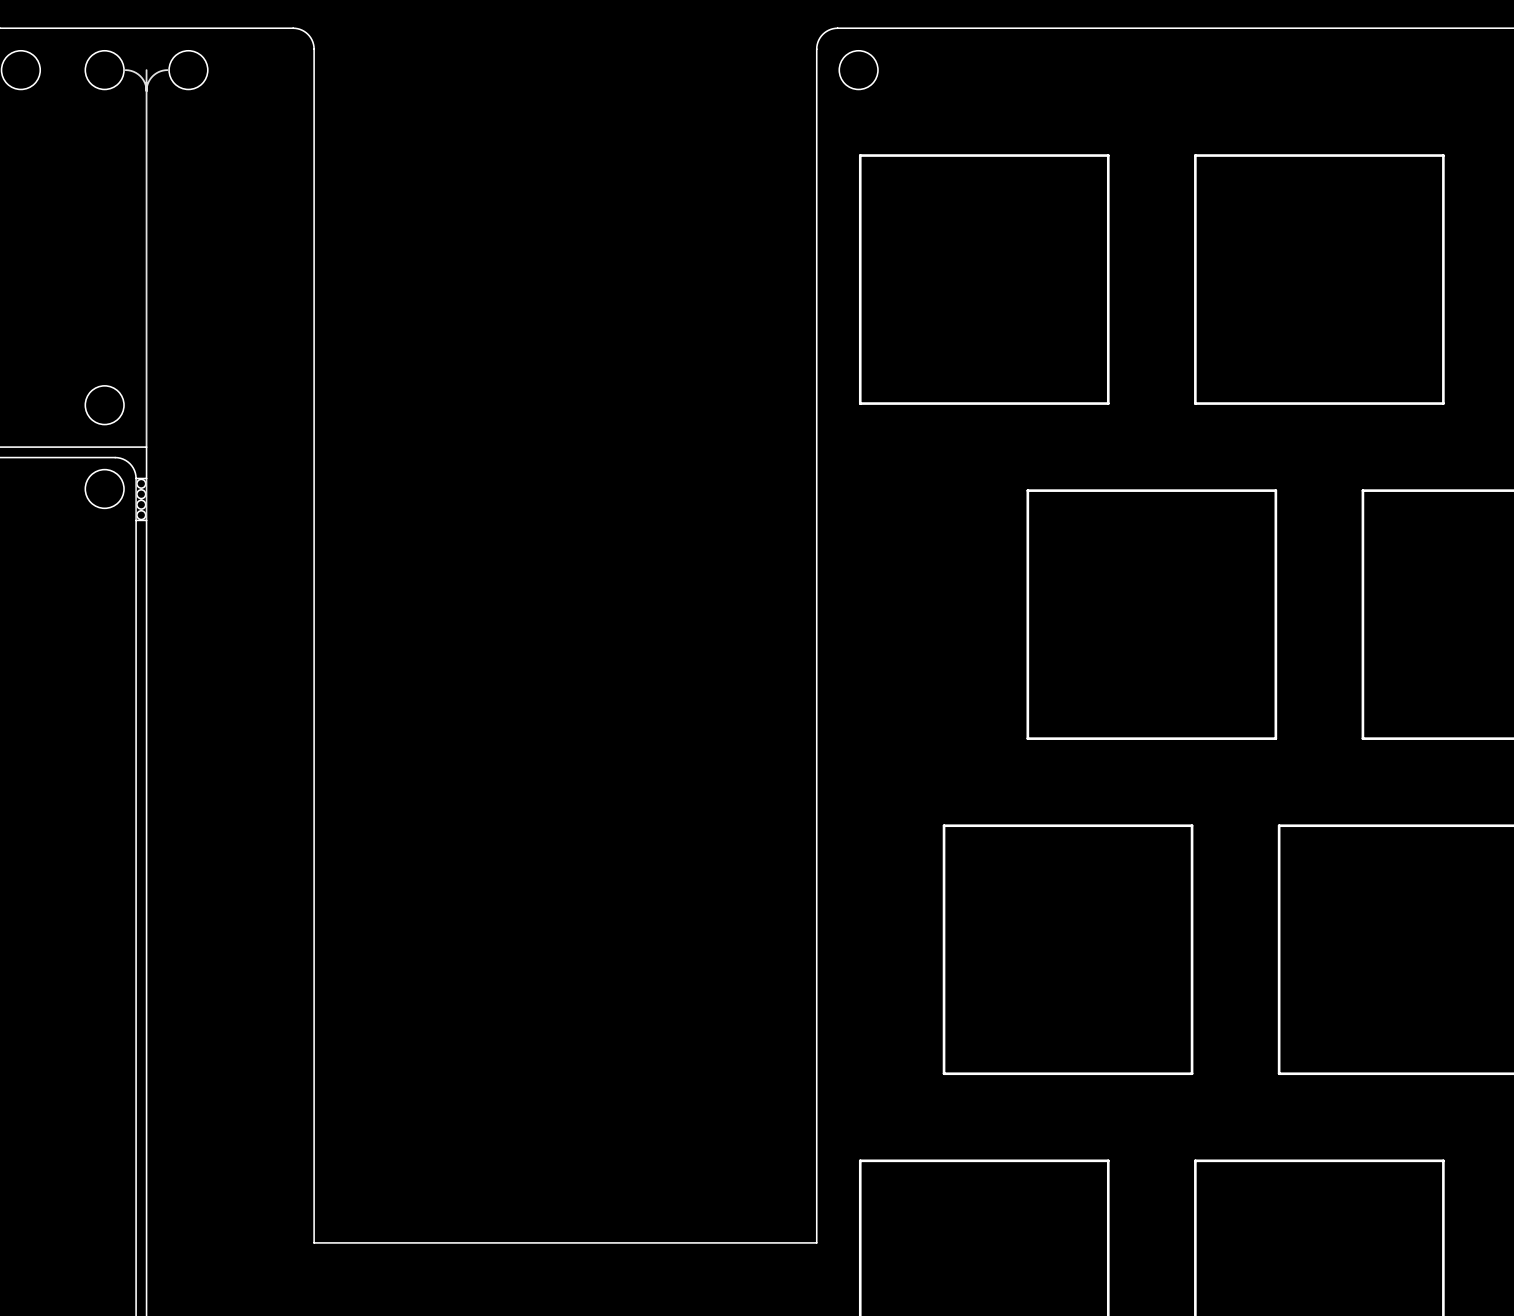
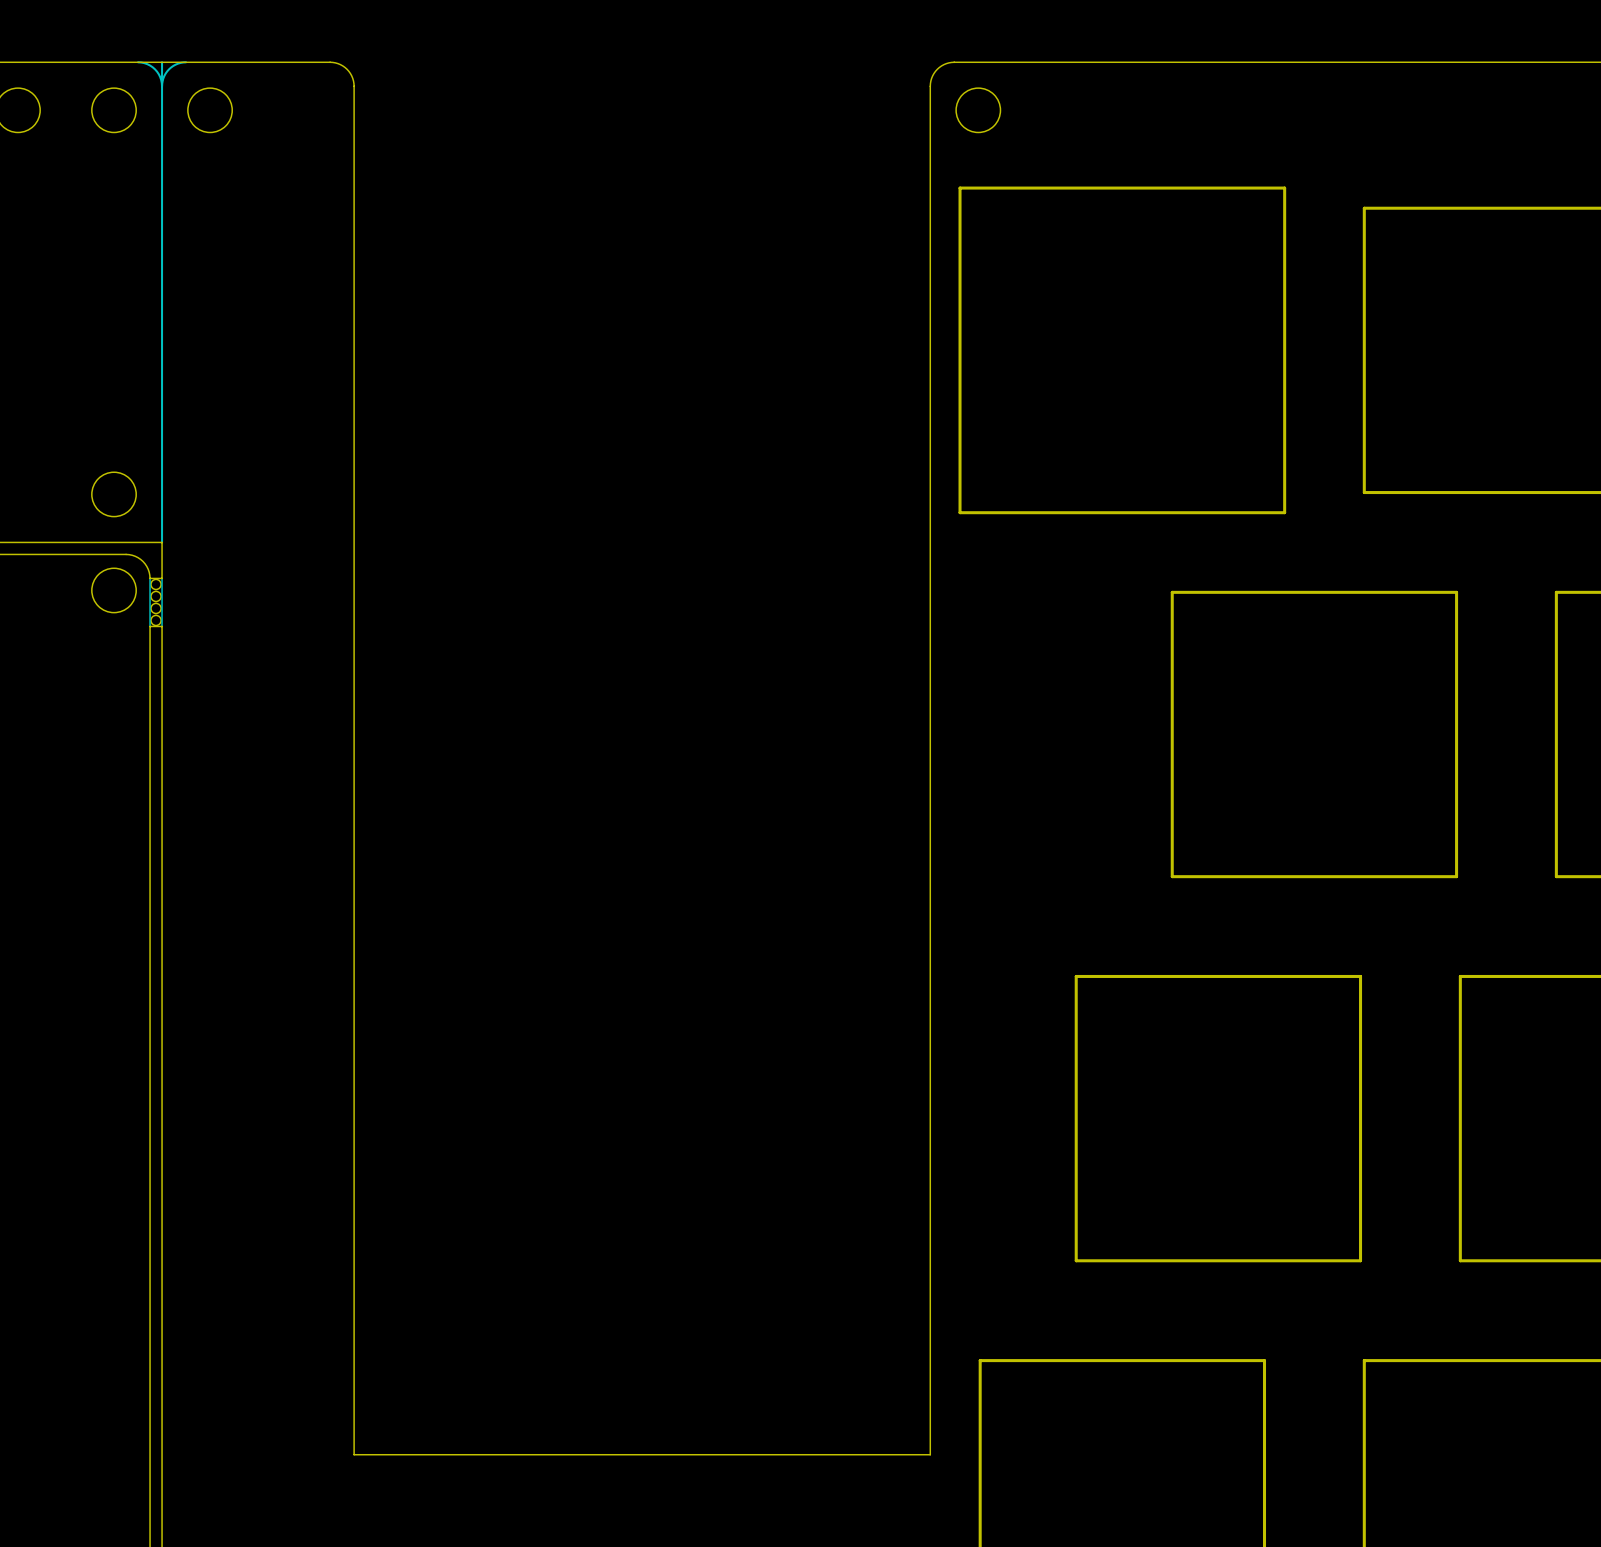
line: none -> (162, 62) (162, 110)
line: (167, 70) (160, 71) (152, 76) (147, 84) (146, 91) (144, 83) (140, 76) (133, 71) (125, 70) -> (186, 62) (178, 63) (169, 69) (164, 75) (162, 86) (160, 77) (155, 69) (147, 64) (138, 62)
drawing shape: [858, 154, 1110, 405] -> [958, 186, 1287, 515]

